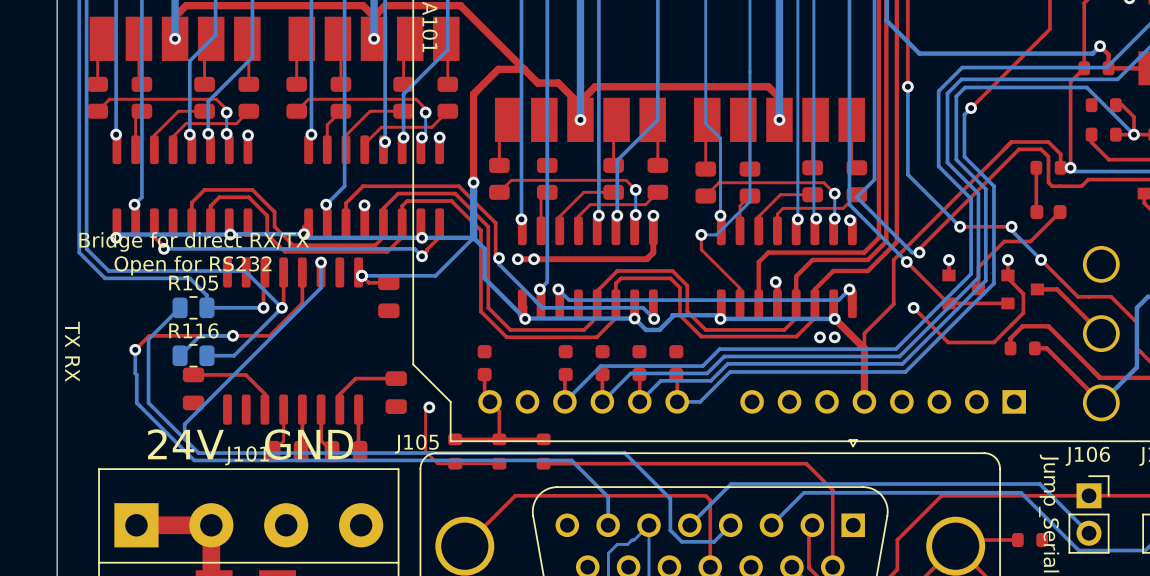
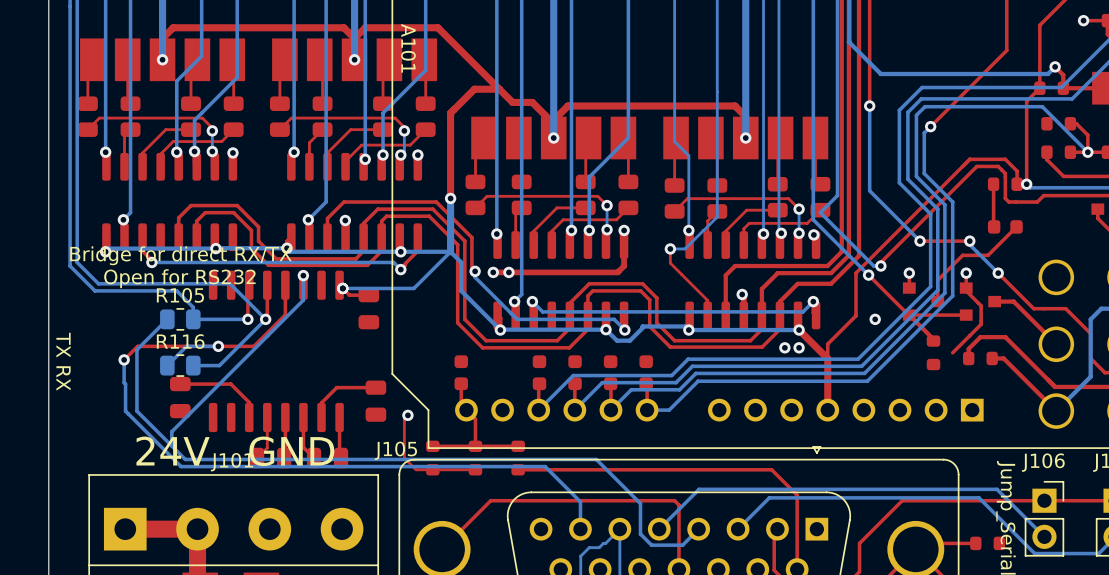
top track: none -> (909, 315) (933, 341)
top track: (913, 307) (948, 342) (993, 342) -> none
part: none -> (933, 352)

